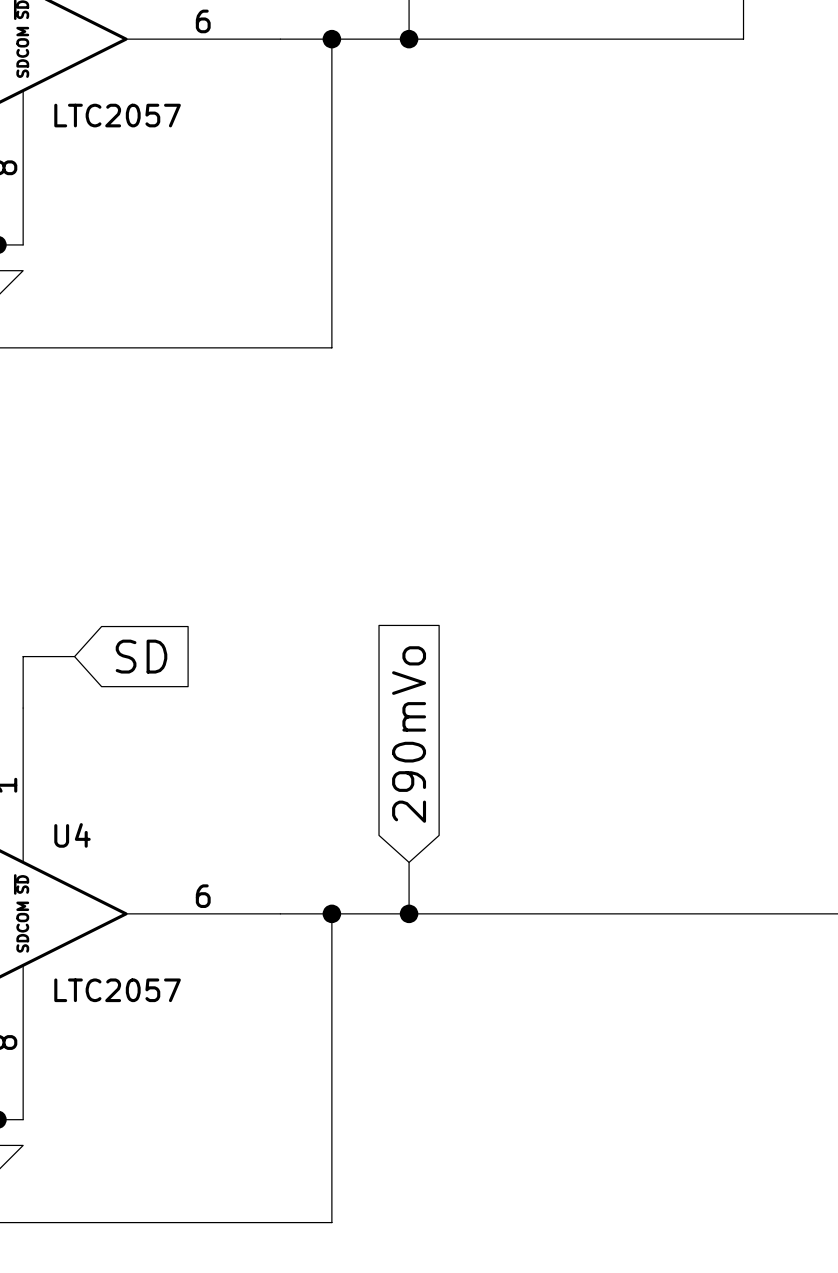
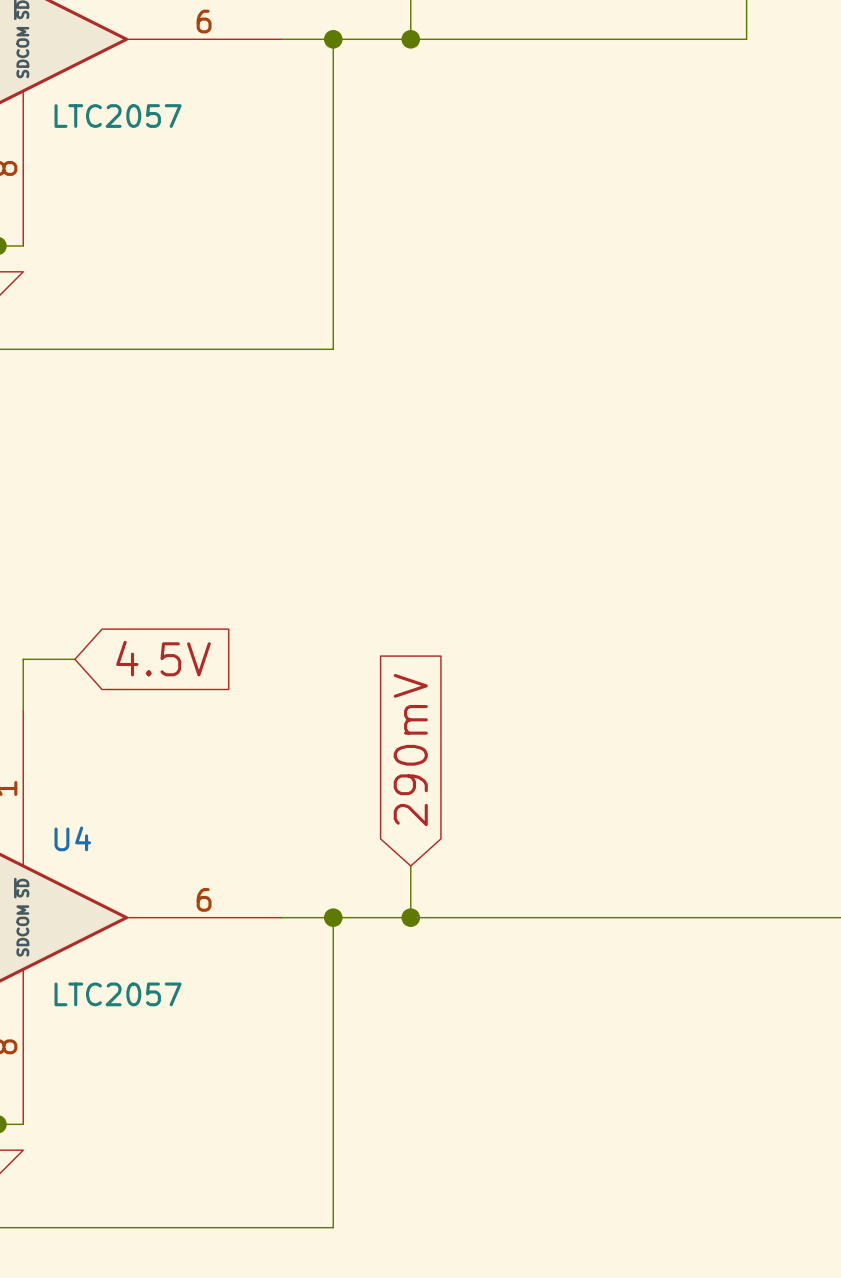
global label: SD (141, 656) -> 4.5V (163, 658)
global label: 290mVo (409, 734) -> 290mV (410, 750)

